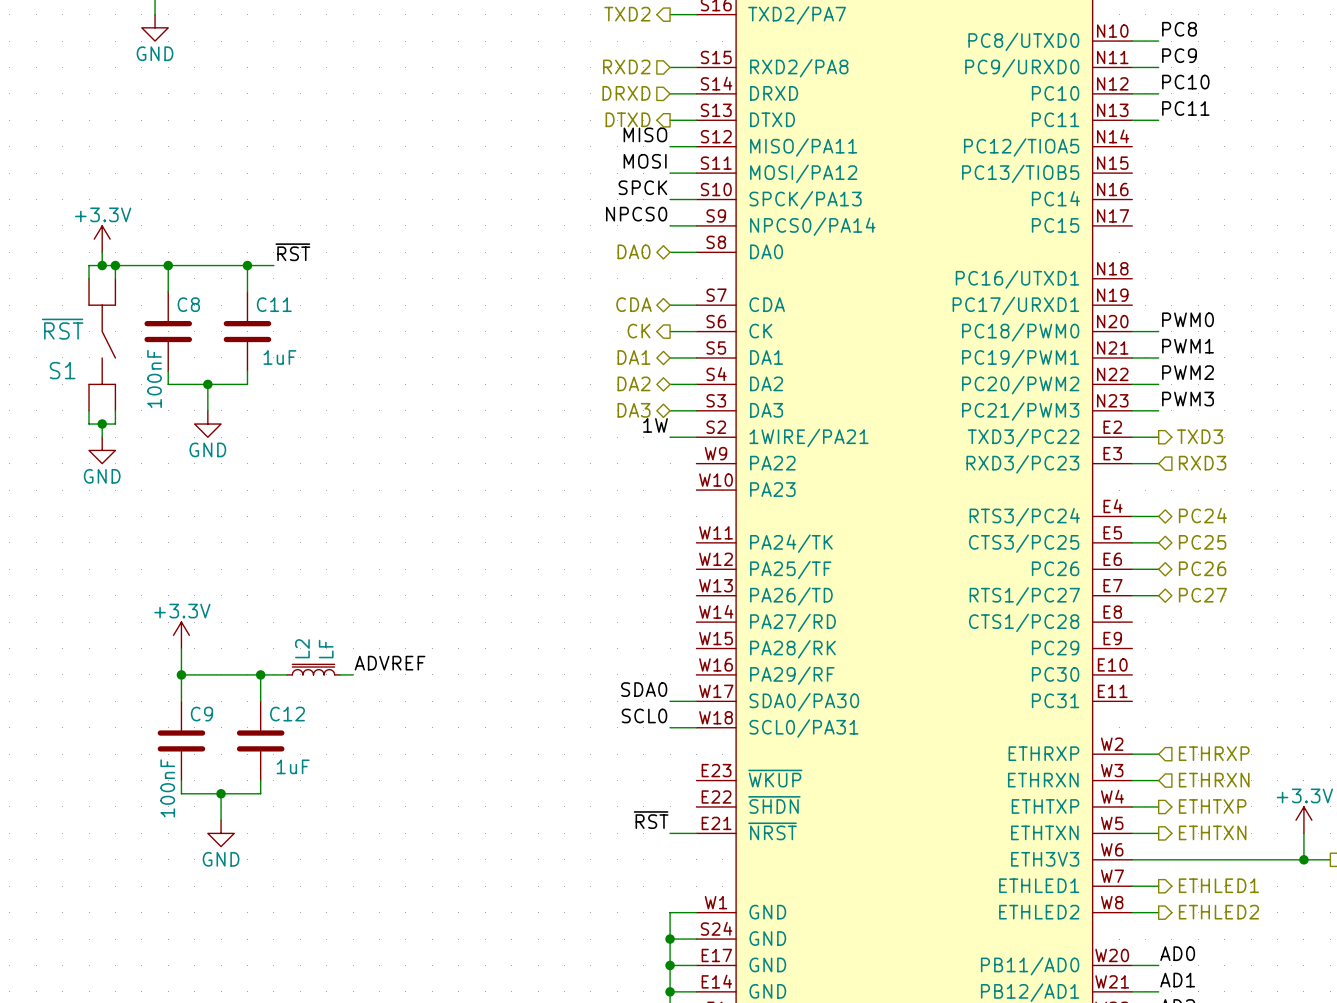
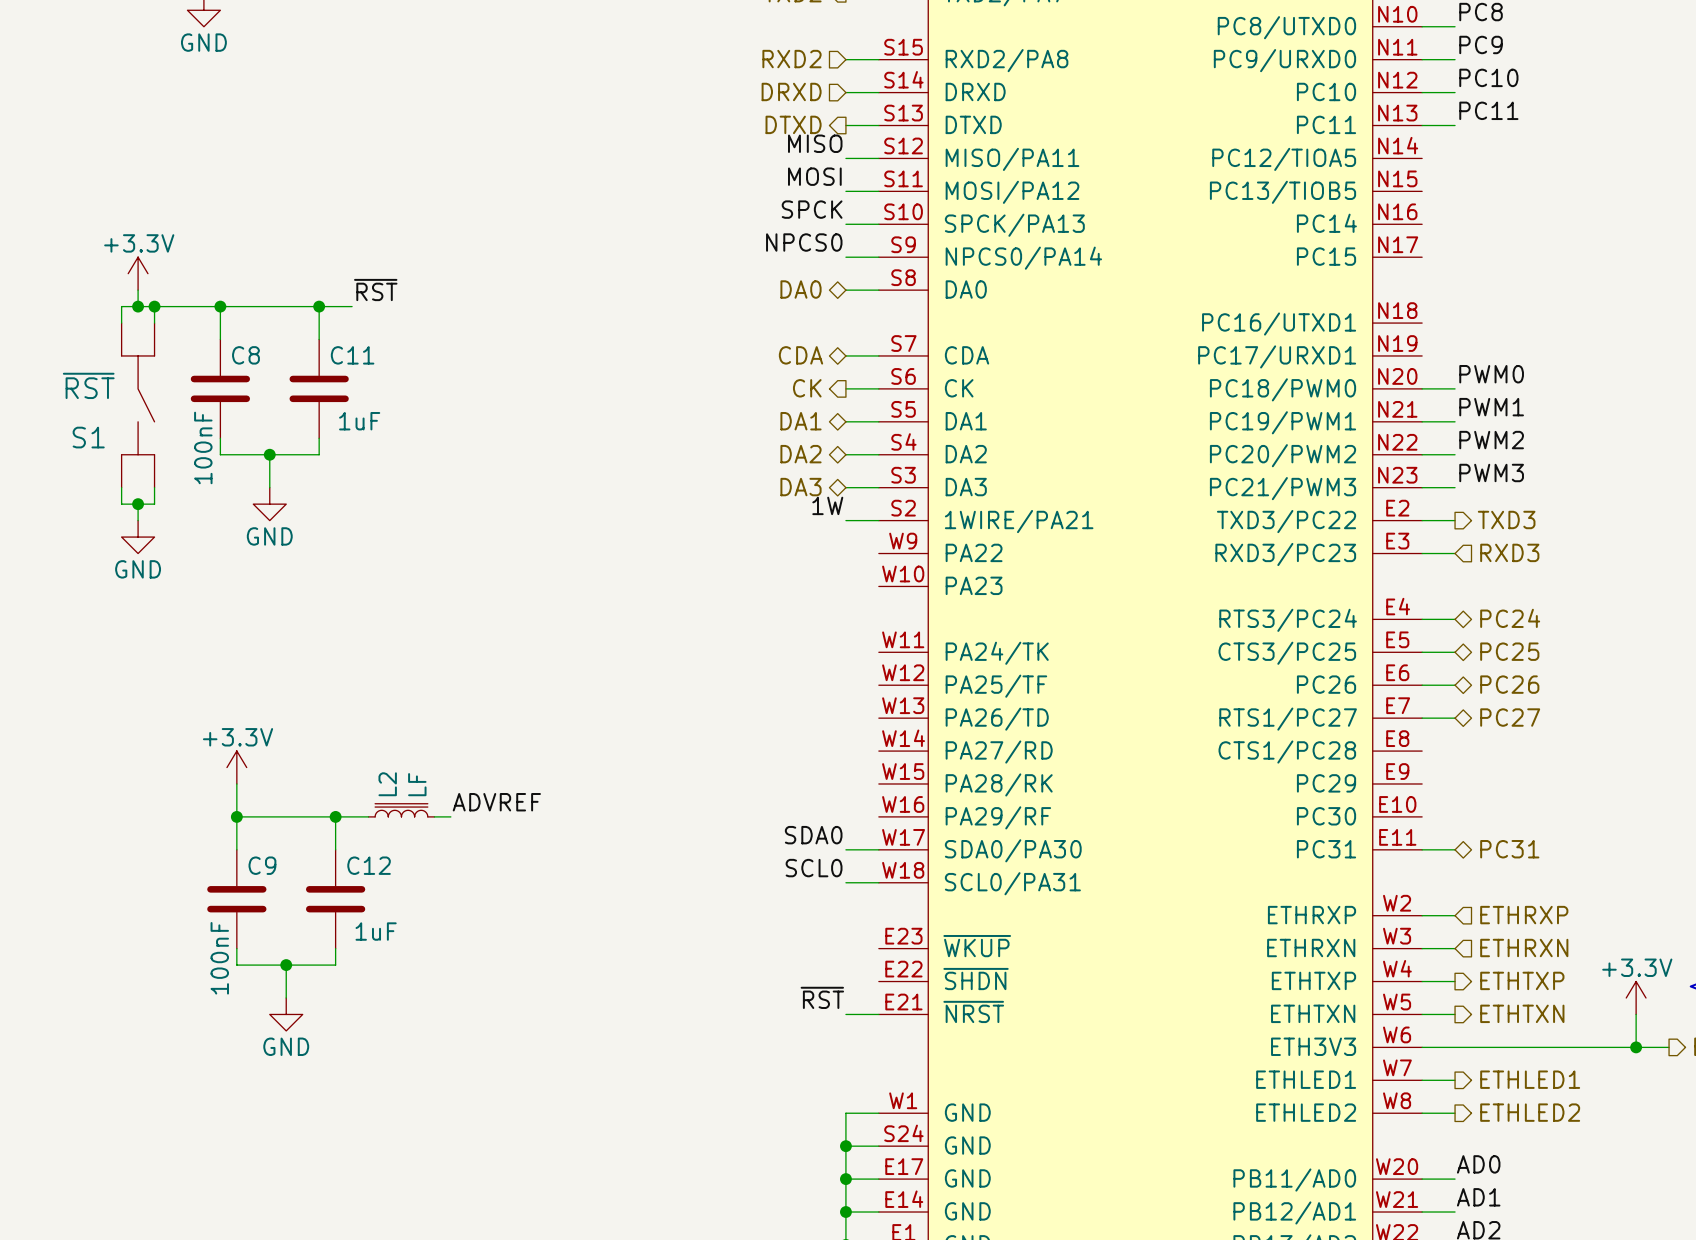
hierarchical label: none -> PC31 (1509, 849)
wire: none -> (1422, 849) (1455, 849)

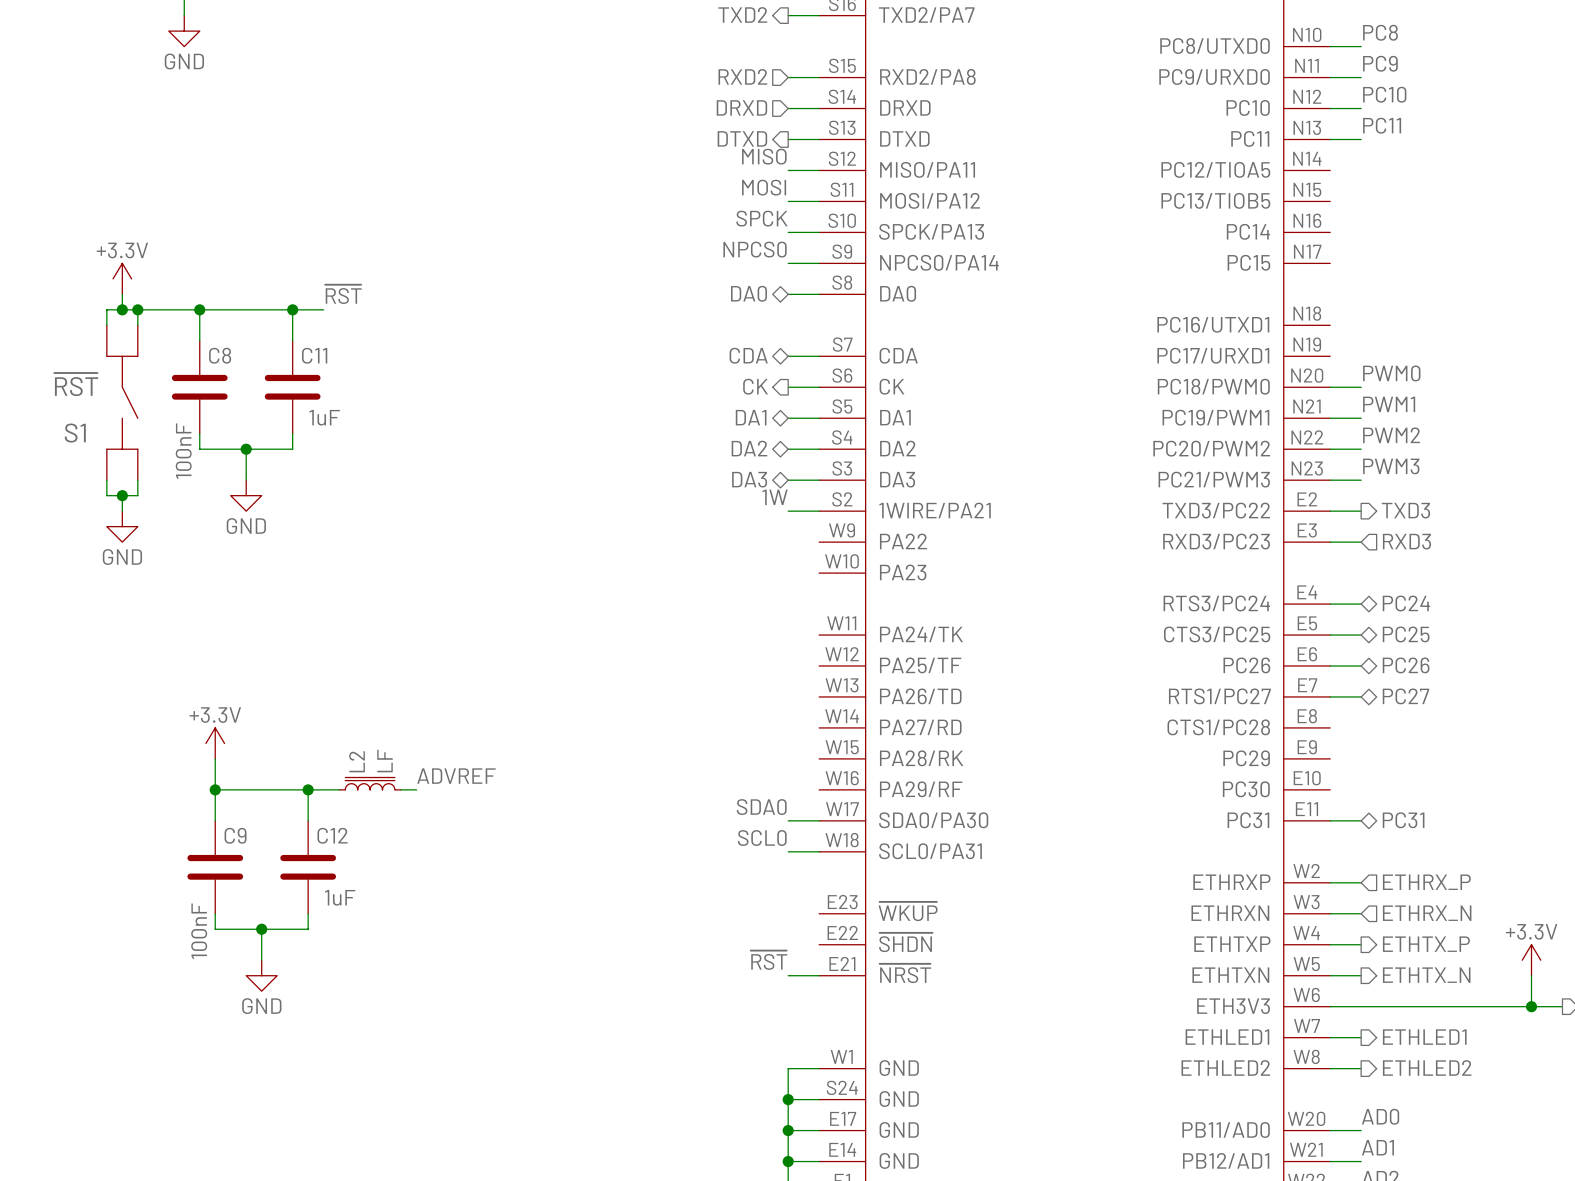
hierarchical label: ETHRXP (1524, 915) -> ETHRX_P (1426, 882)
hierarchical label: ETHRXN (1524, 948) -> ETHRX_N (1427, 913)
hierarchical label: ETHTXP (1522, 980) -> ETHTX_P (1426, 944)
hierarchical label: ETHTXN (1522, 1013) -> ETHTX_N (1426, 975)

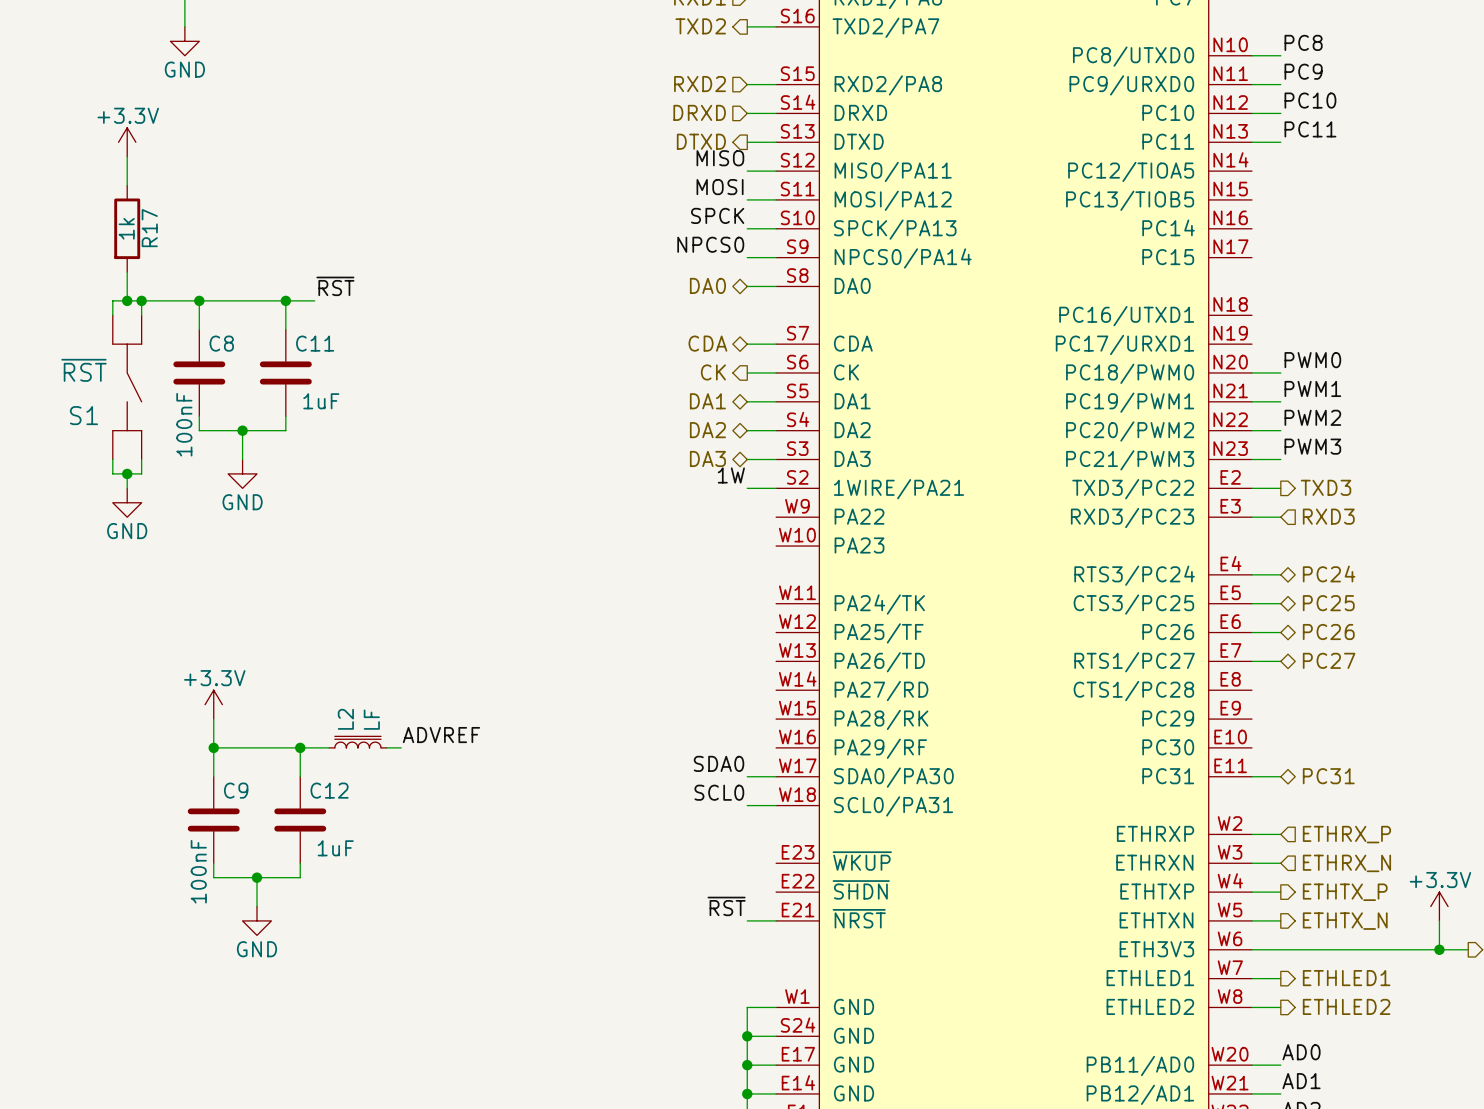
wire: none -> (127, 156) (127, 185)
R17: none -> 1k (127, 228)
power symbol position: +3.3V (122, 278) -> +3.3V (127, 142)

